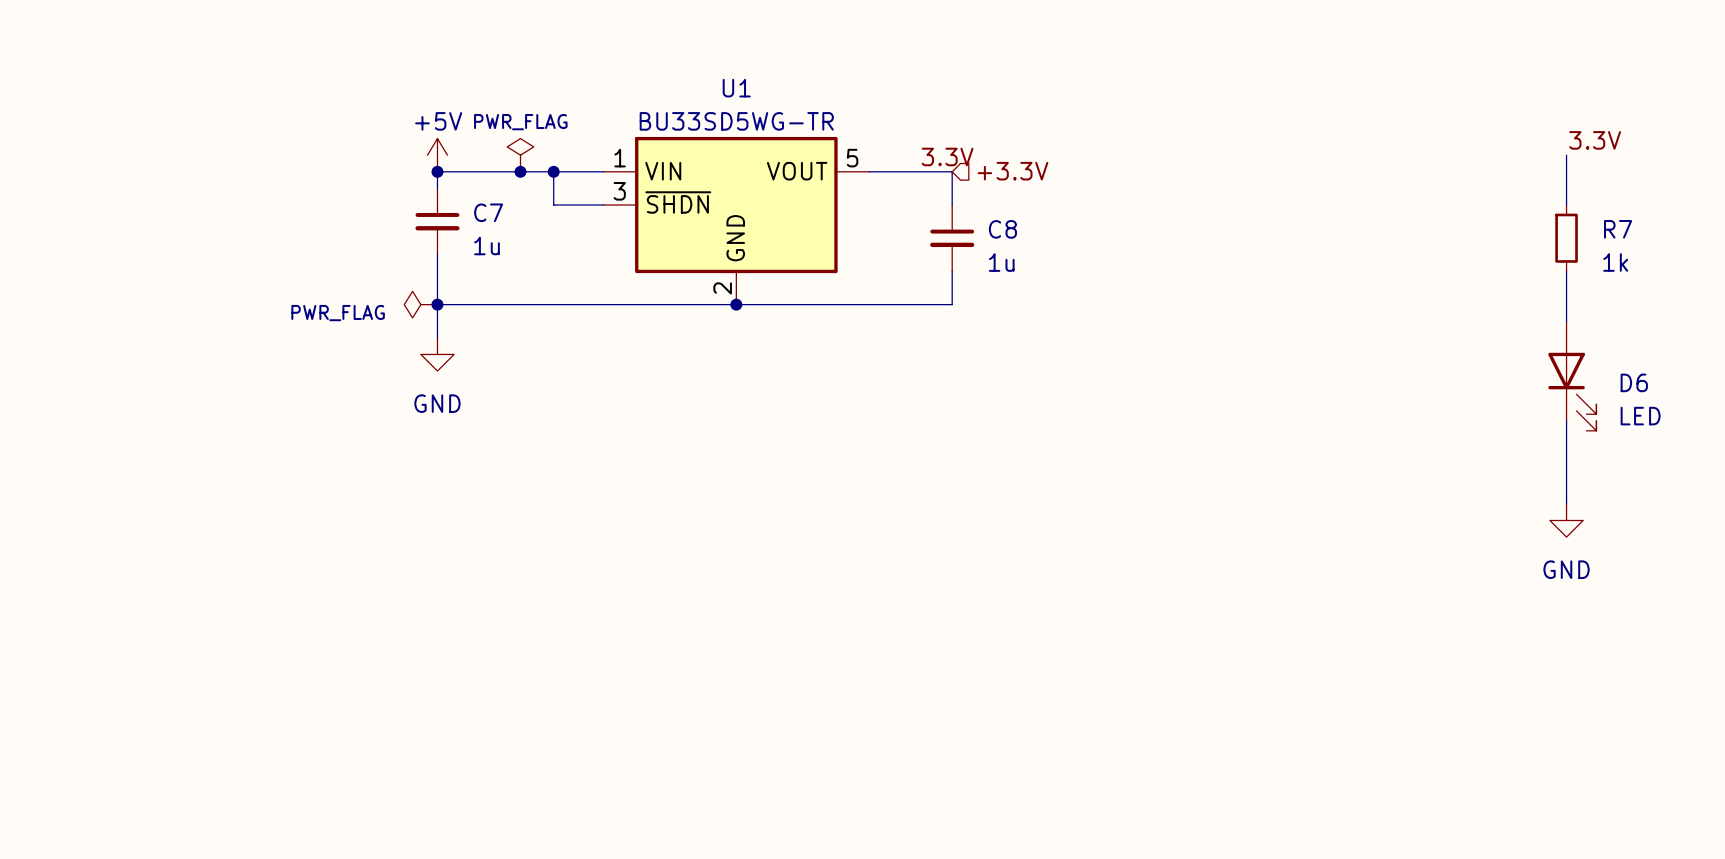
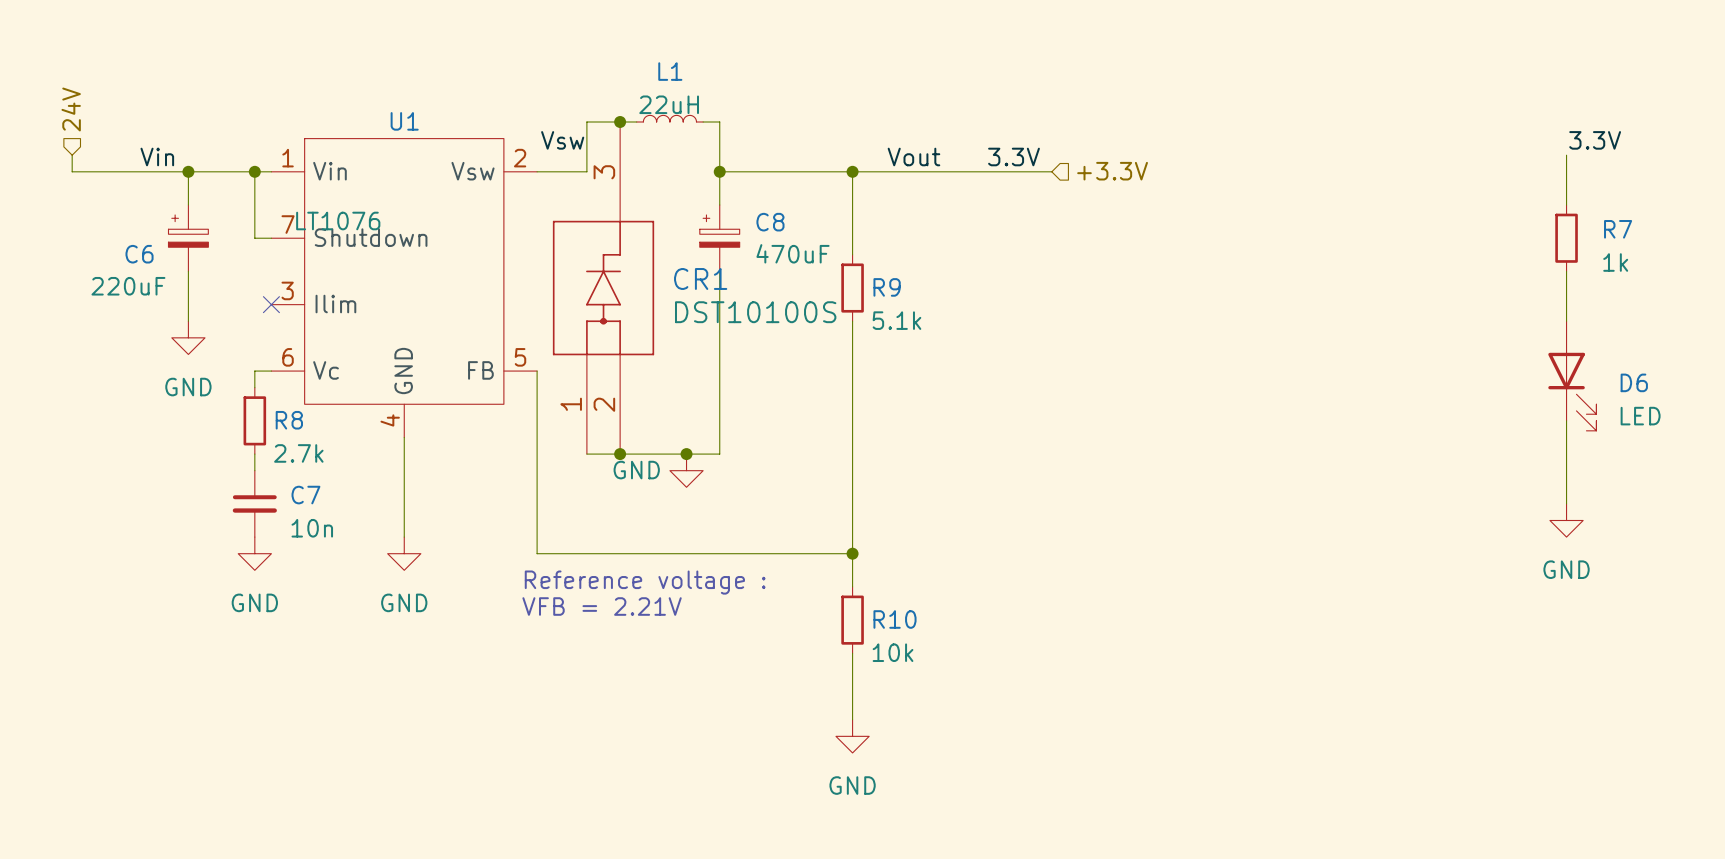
U1 name position: U1 (736, 88) -> U1 (404, 121)
hierarchical label: none -> 24V (71, 109)
L1: none -> 22uH (669, 118)
junction: none -> (620, 121)
U1 value: BU33SD5WG-TR (736, 121) -> LT1076 (338, 221)
U1 symbol: [603, 136, 870, 305] -> [271, 138, 538, 438]
label: none -> Vsw (562, 140)
wire: none -> (72, 155) (72, 171) (271, 171)
power symbol: +5V (437, 155) -> none
power symbol: PWR_FLAG (520, 155) -> none
label: none -> Vin (157, 156)
label: none -> Vout (913, 156)
label position: 3.3V (947, 156) -> 3.3V (1013, 156)
wire: none -> (188, 171) (188, 205)
junction: none -> (188, 171)
wire: none -> (254, 171) (254, 238) (271, 238)
junction: none -> (254, 171)
junction: (437, 171) -> none
junction: (520, 171) -> none
wire: (537, 171) (437, 171) (437, 188) -> none
wire: (553, 171) (553, 205) (603, 205) -> none
junction: (553, 171) -> none
wire: (586, 171) (603, 171) -> (586, 171) (586, 121) (636, 121)
junction: none -> (719, 171)
wire: none -> (852, 171) (852, 254)
junction: none -> (852, 171)
wire: (952, 171) (952, 205) -> (952, 171) (1051, 171)
hierarchical label position: +3.3V (1012, 171) -> +3.3V (1112, 171)
C8 symbol: [930, 205, 975, 272] -> [699, 205, 740, 272]
C7 position: (437, 221) -> (254, 503)
C6: none -> 220uF (188, 238)
C7 value: 1u (487, 245) -> 10n (312, 528)
wire: (437, 254) (437, 337) -> none
C8 value: 1u (1001, 262) -> 470uF (793, 253)
wire: none -> (188, 271) (188, 321)
wire: none -> (719, 271) (719, 454) (586, 454)
wire: (952, 271) (952, 304) (437, 304) -> none
CR1: none -> DST10100S (603, 288)
R9: none -> 5.1k (852, 288)
no-connect mark: none -> (271, 304)
power symbol: PWR_FLAG (420, 304) -> none
junction: (437, 304) -> none
junction: (736, 304) -> none
wire: none -> (852, 321) (852, 586)
power symbol: none -> GND (188, 337)
power symbol: GND (437, 354) -> none
wire: none -> (271, 371) (254, 371) (254, 387)
wire: none -> (537, 371) (537, 553) (852, 553)
R8: none -> 2.7k (254, 420)
wire: none -> (404, 437) (404, 537)
wire: none -> (254, 454) (254, 470)
junction: none -> (620, 454)
junction: none -> (686, 454)
power symbol: none -> GND (686, 470)
power symbol: none -> GND (254, 553)
power symbol: none -> GND (404, 553)
junction: none -> (852, 553)
text: none -> Reference voltage : (645, 582)
text: none -> VFB = 2.21V (602, 606)
R10: none -> 10k (852, 620)
wire: none -> (852, 653) (852, 719)
power symbol: none -> GND (852, 736)

